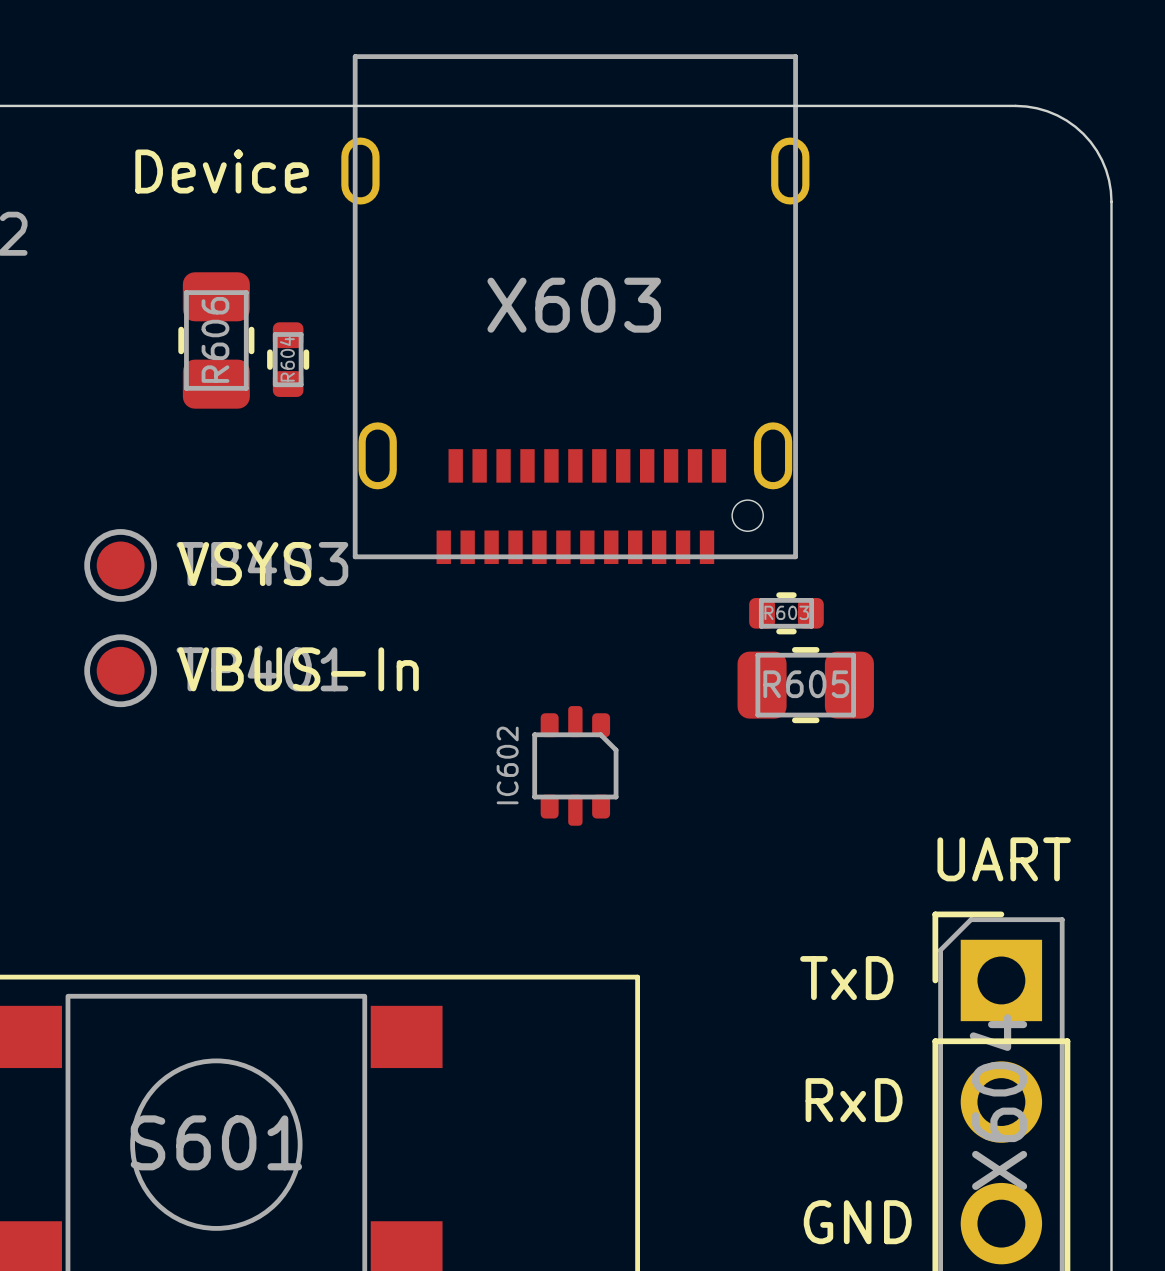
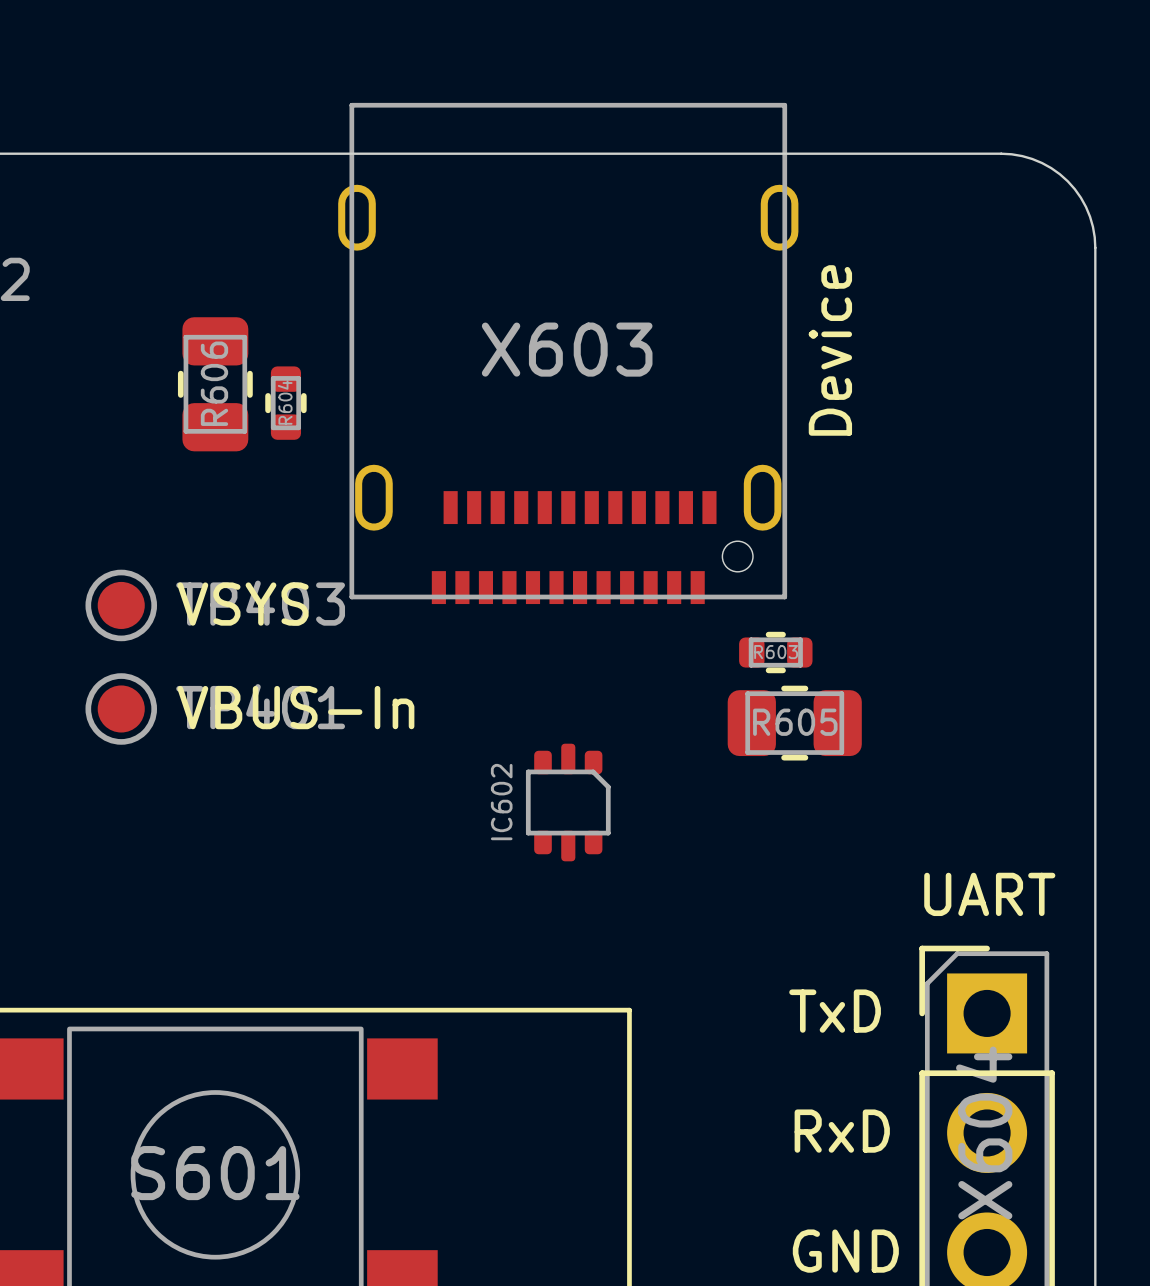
X603 value rotation: 0° (222, 171) -> 90° counterclockwise (830, 350)
X603 value position: Device (222, 171) -> Device (830, 350)

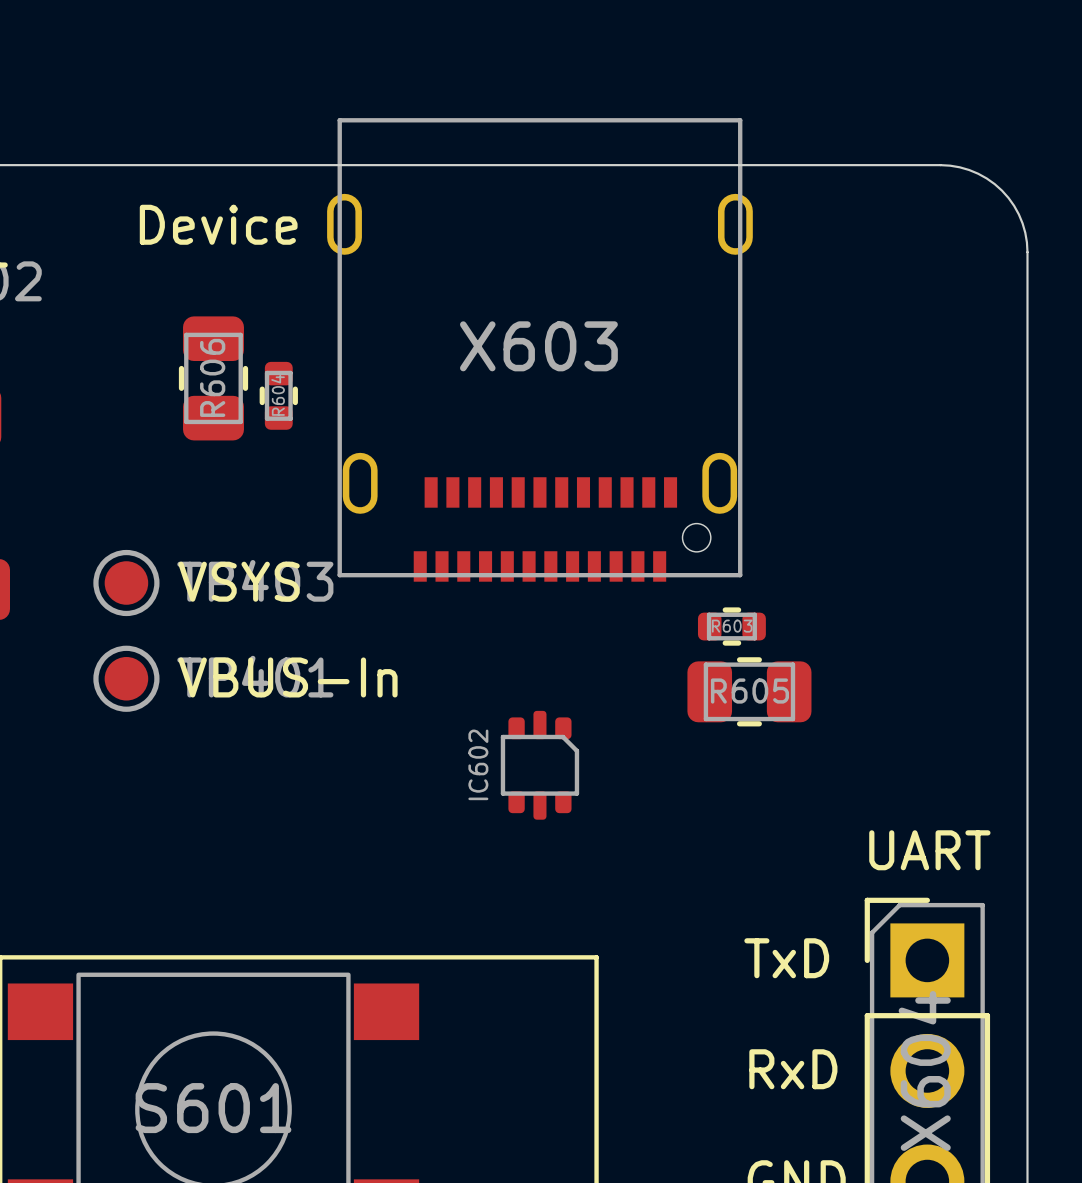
X603 value rotation: 0° (830, 350) -> 90° clockwise (218, 224)
X603 value position: Device (830, 350) -> Device (218, 224)

